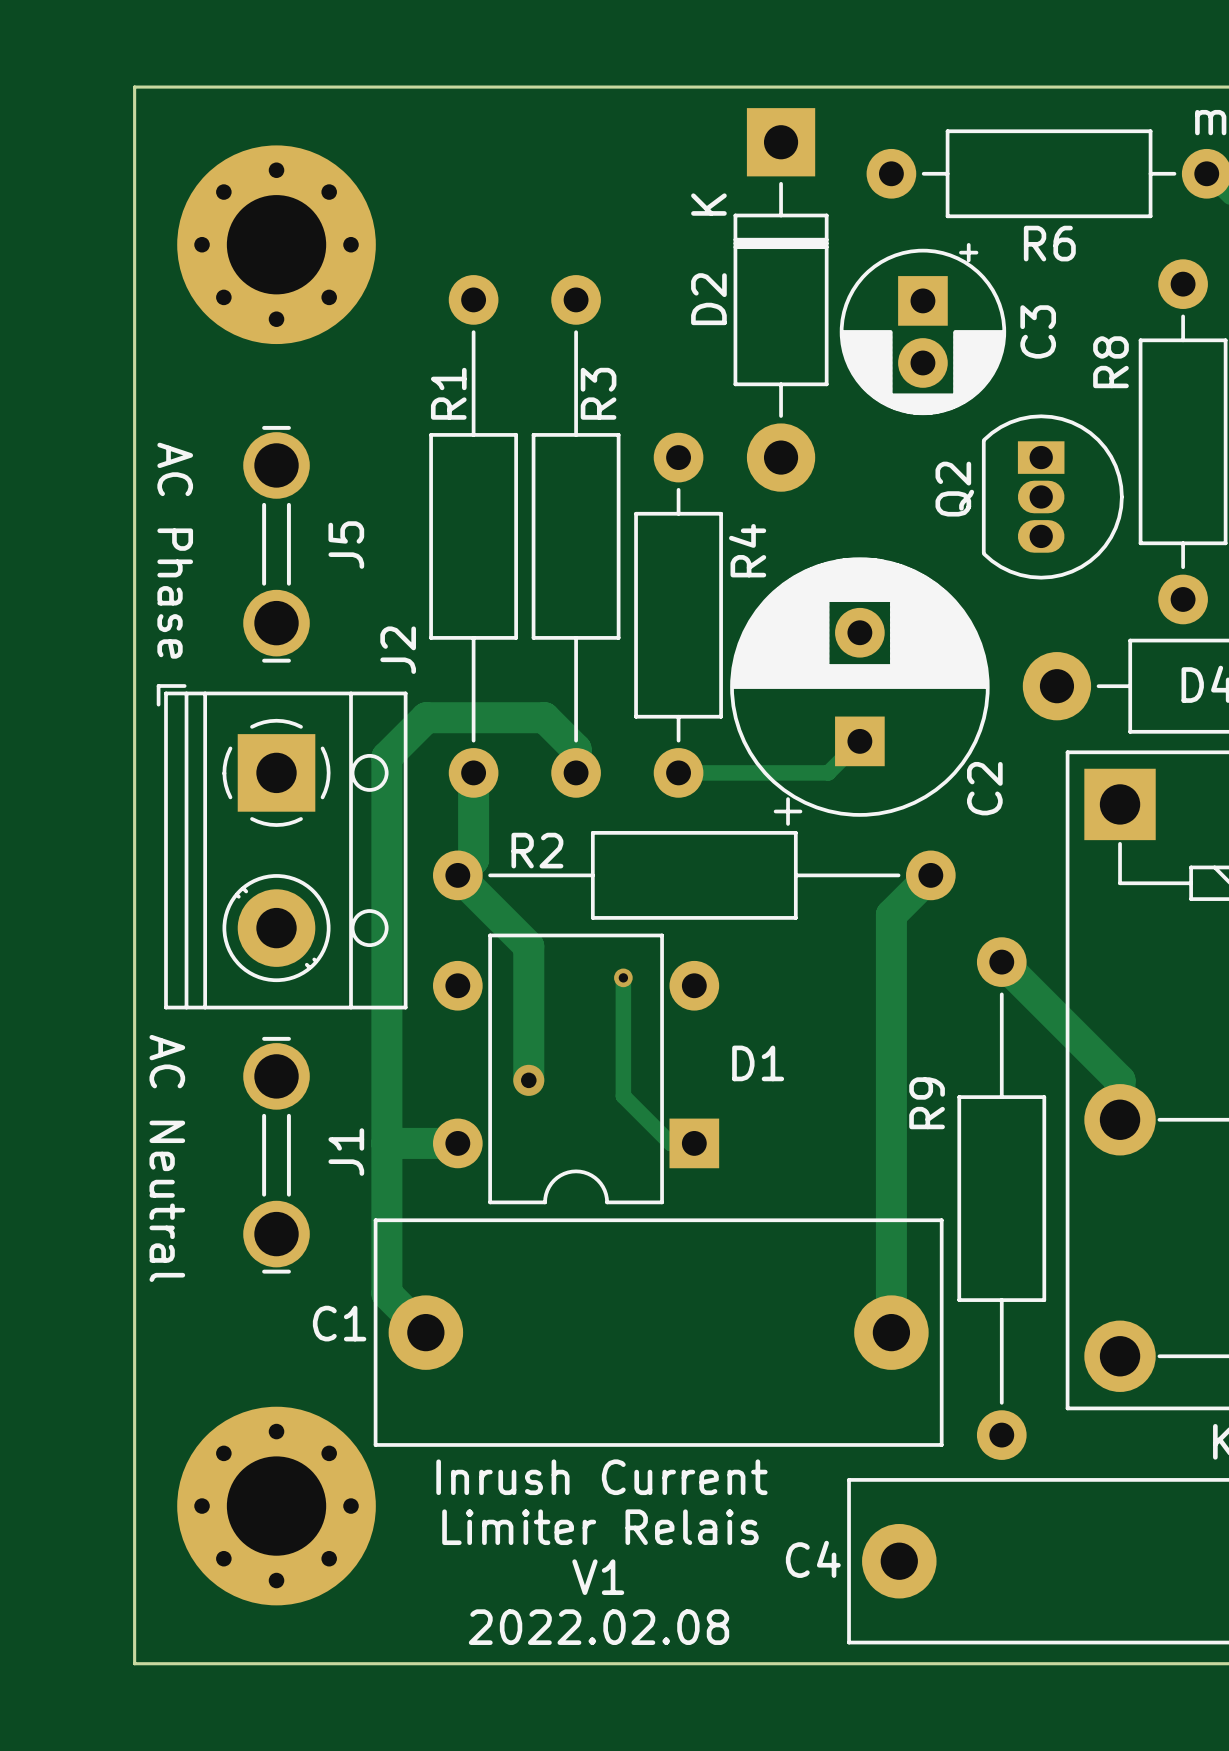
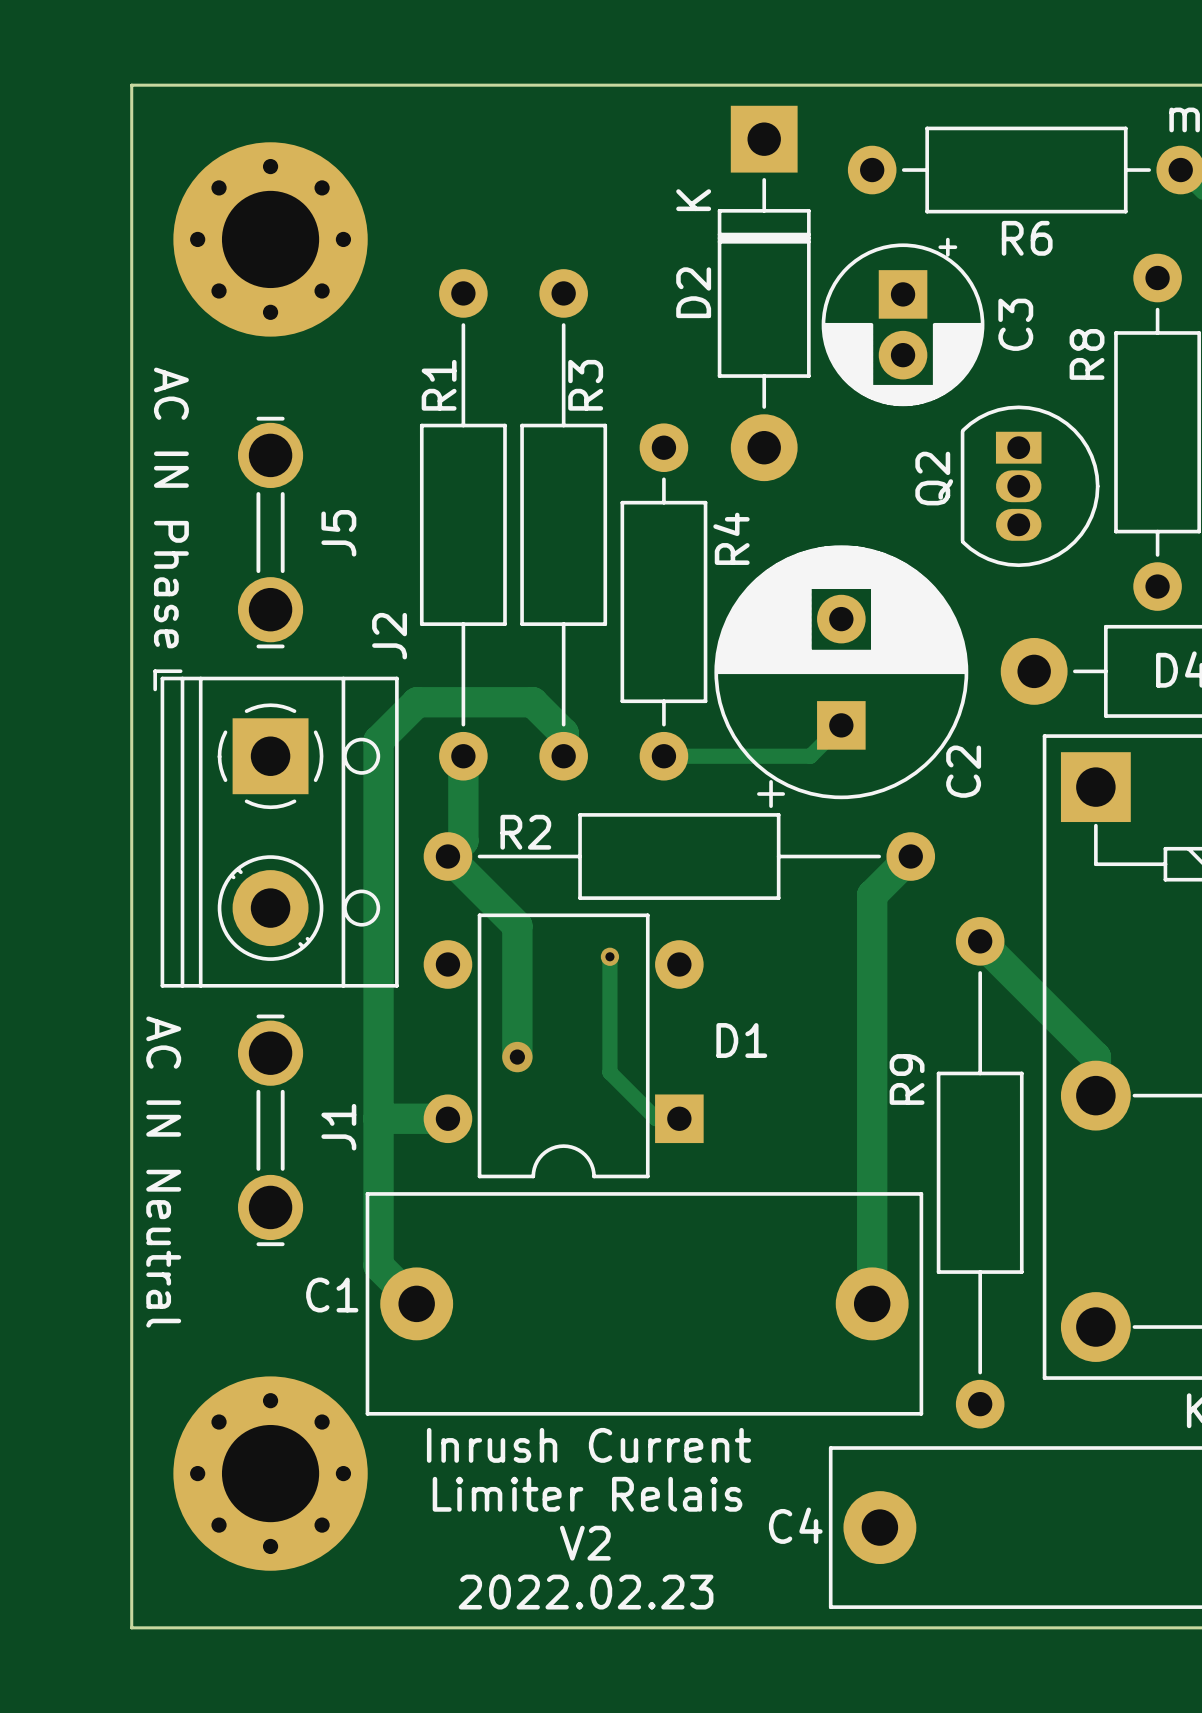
text: AC Phase (175, 550) -> AC IN Phase (171, 507)
text: AC Neutral (167, 1158) -> AC IN Neutral (163, 1172)
text: V1 (598, 1577) -> V2 (585, 1543)
text: 2022.02.08 (598, 1627) -> 2022.02.23 (586, 1592)

